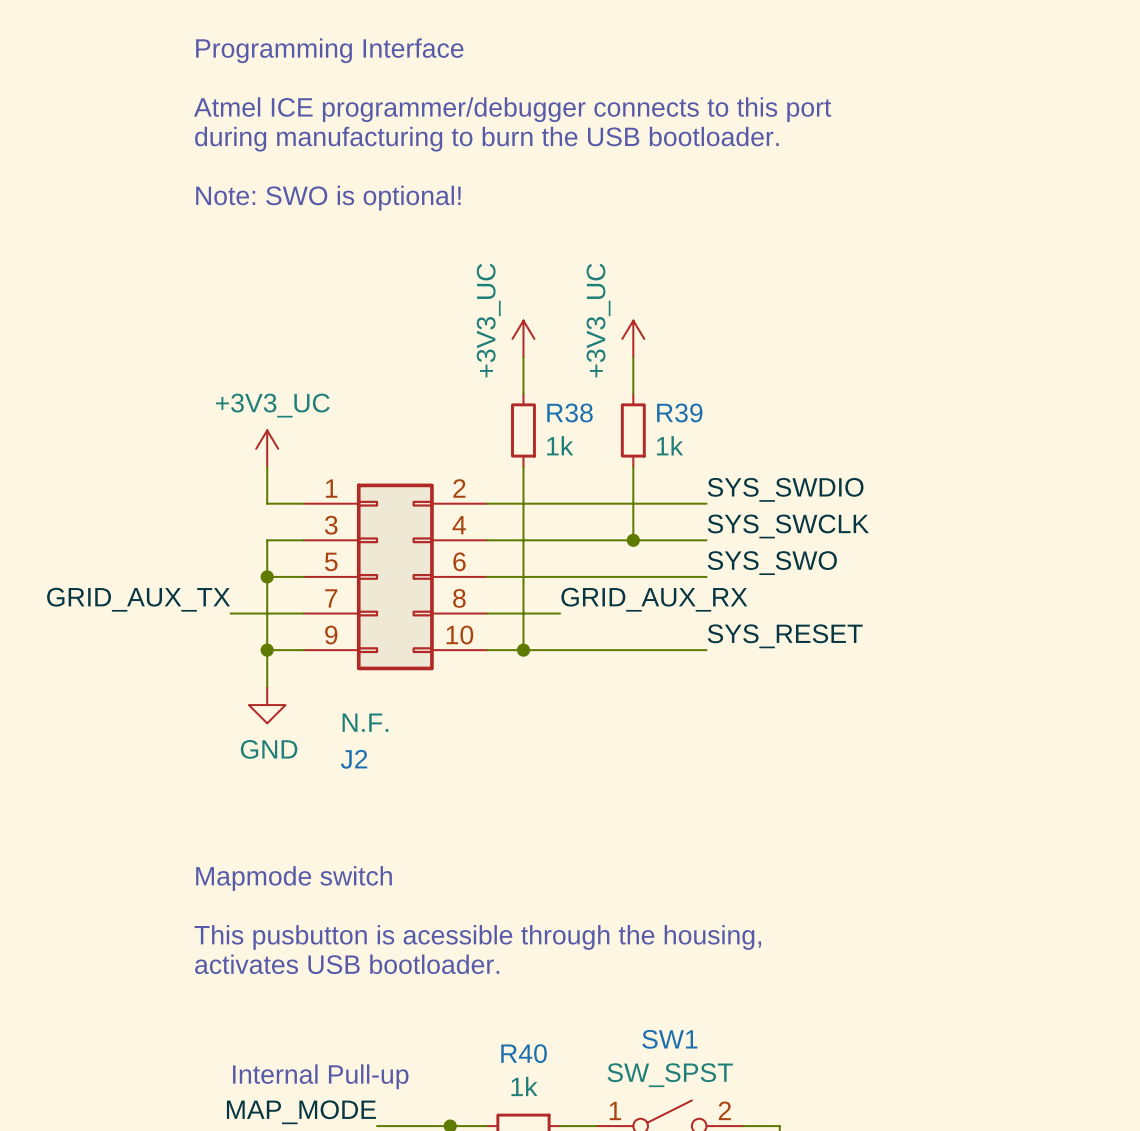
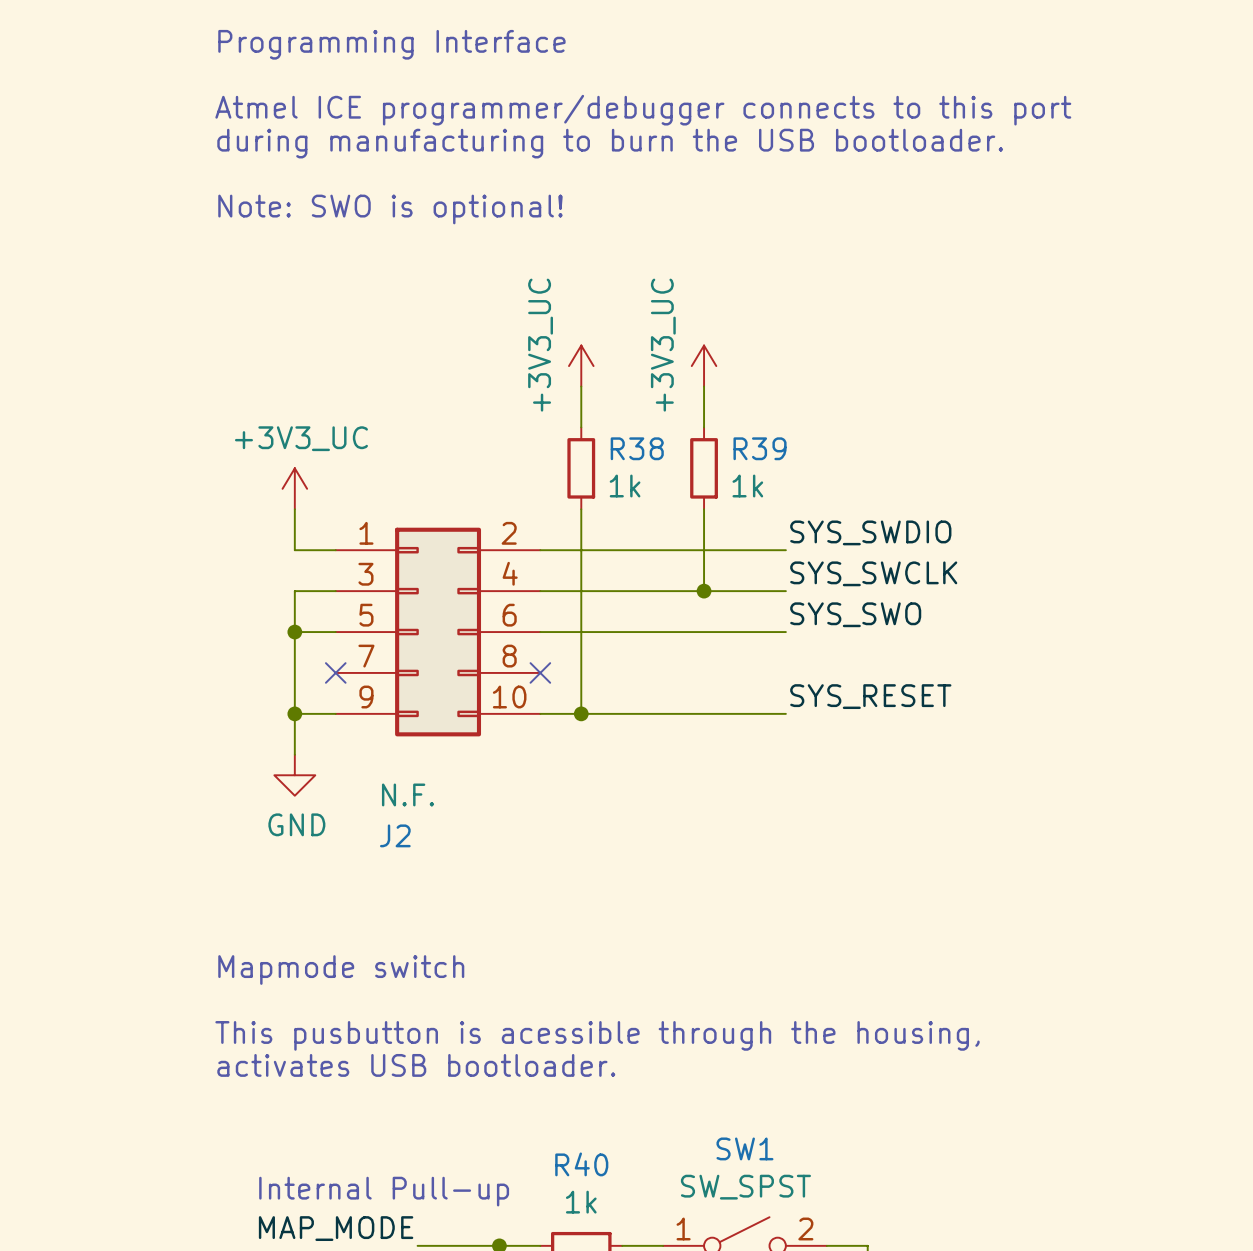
label: GRID_AUX_TX (138, 599) -> none
label: GRID_AUX_RX (654, 599) -> none
wire: (230, 613) (303, 613) -> none
no-connect mark: none -> (335, 672)
wire: (486, 613) (560, 613) -> none
no-connect mark: none -> (540, 672)

